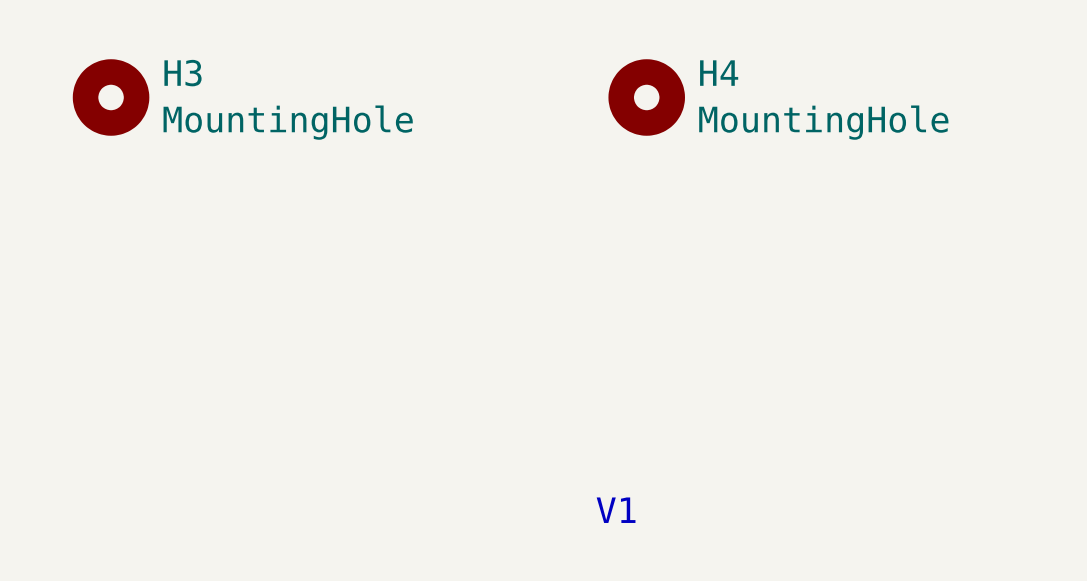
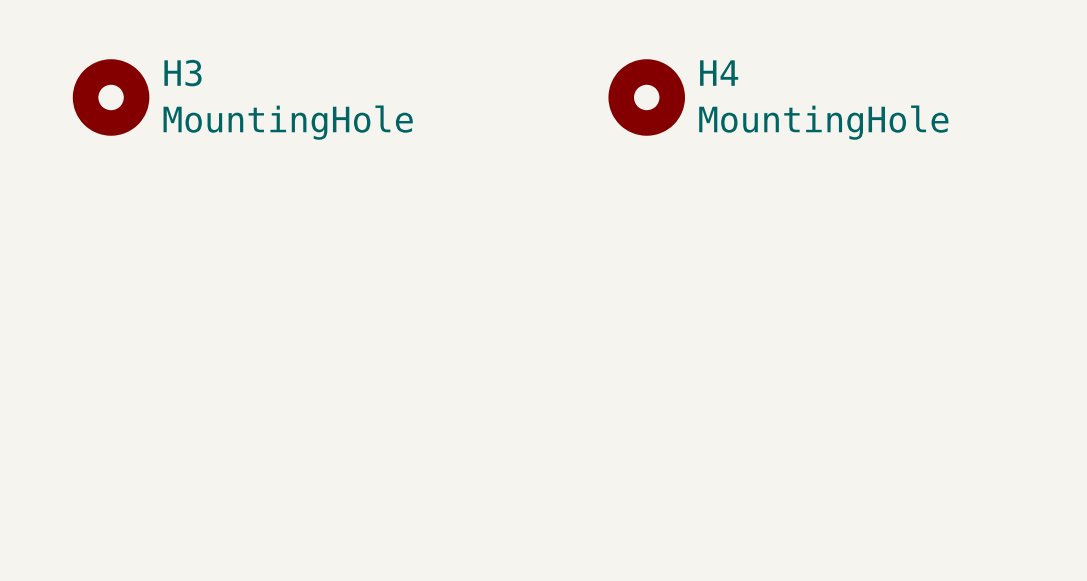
text: V1 (616, 510) -> none

